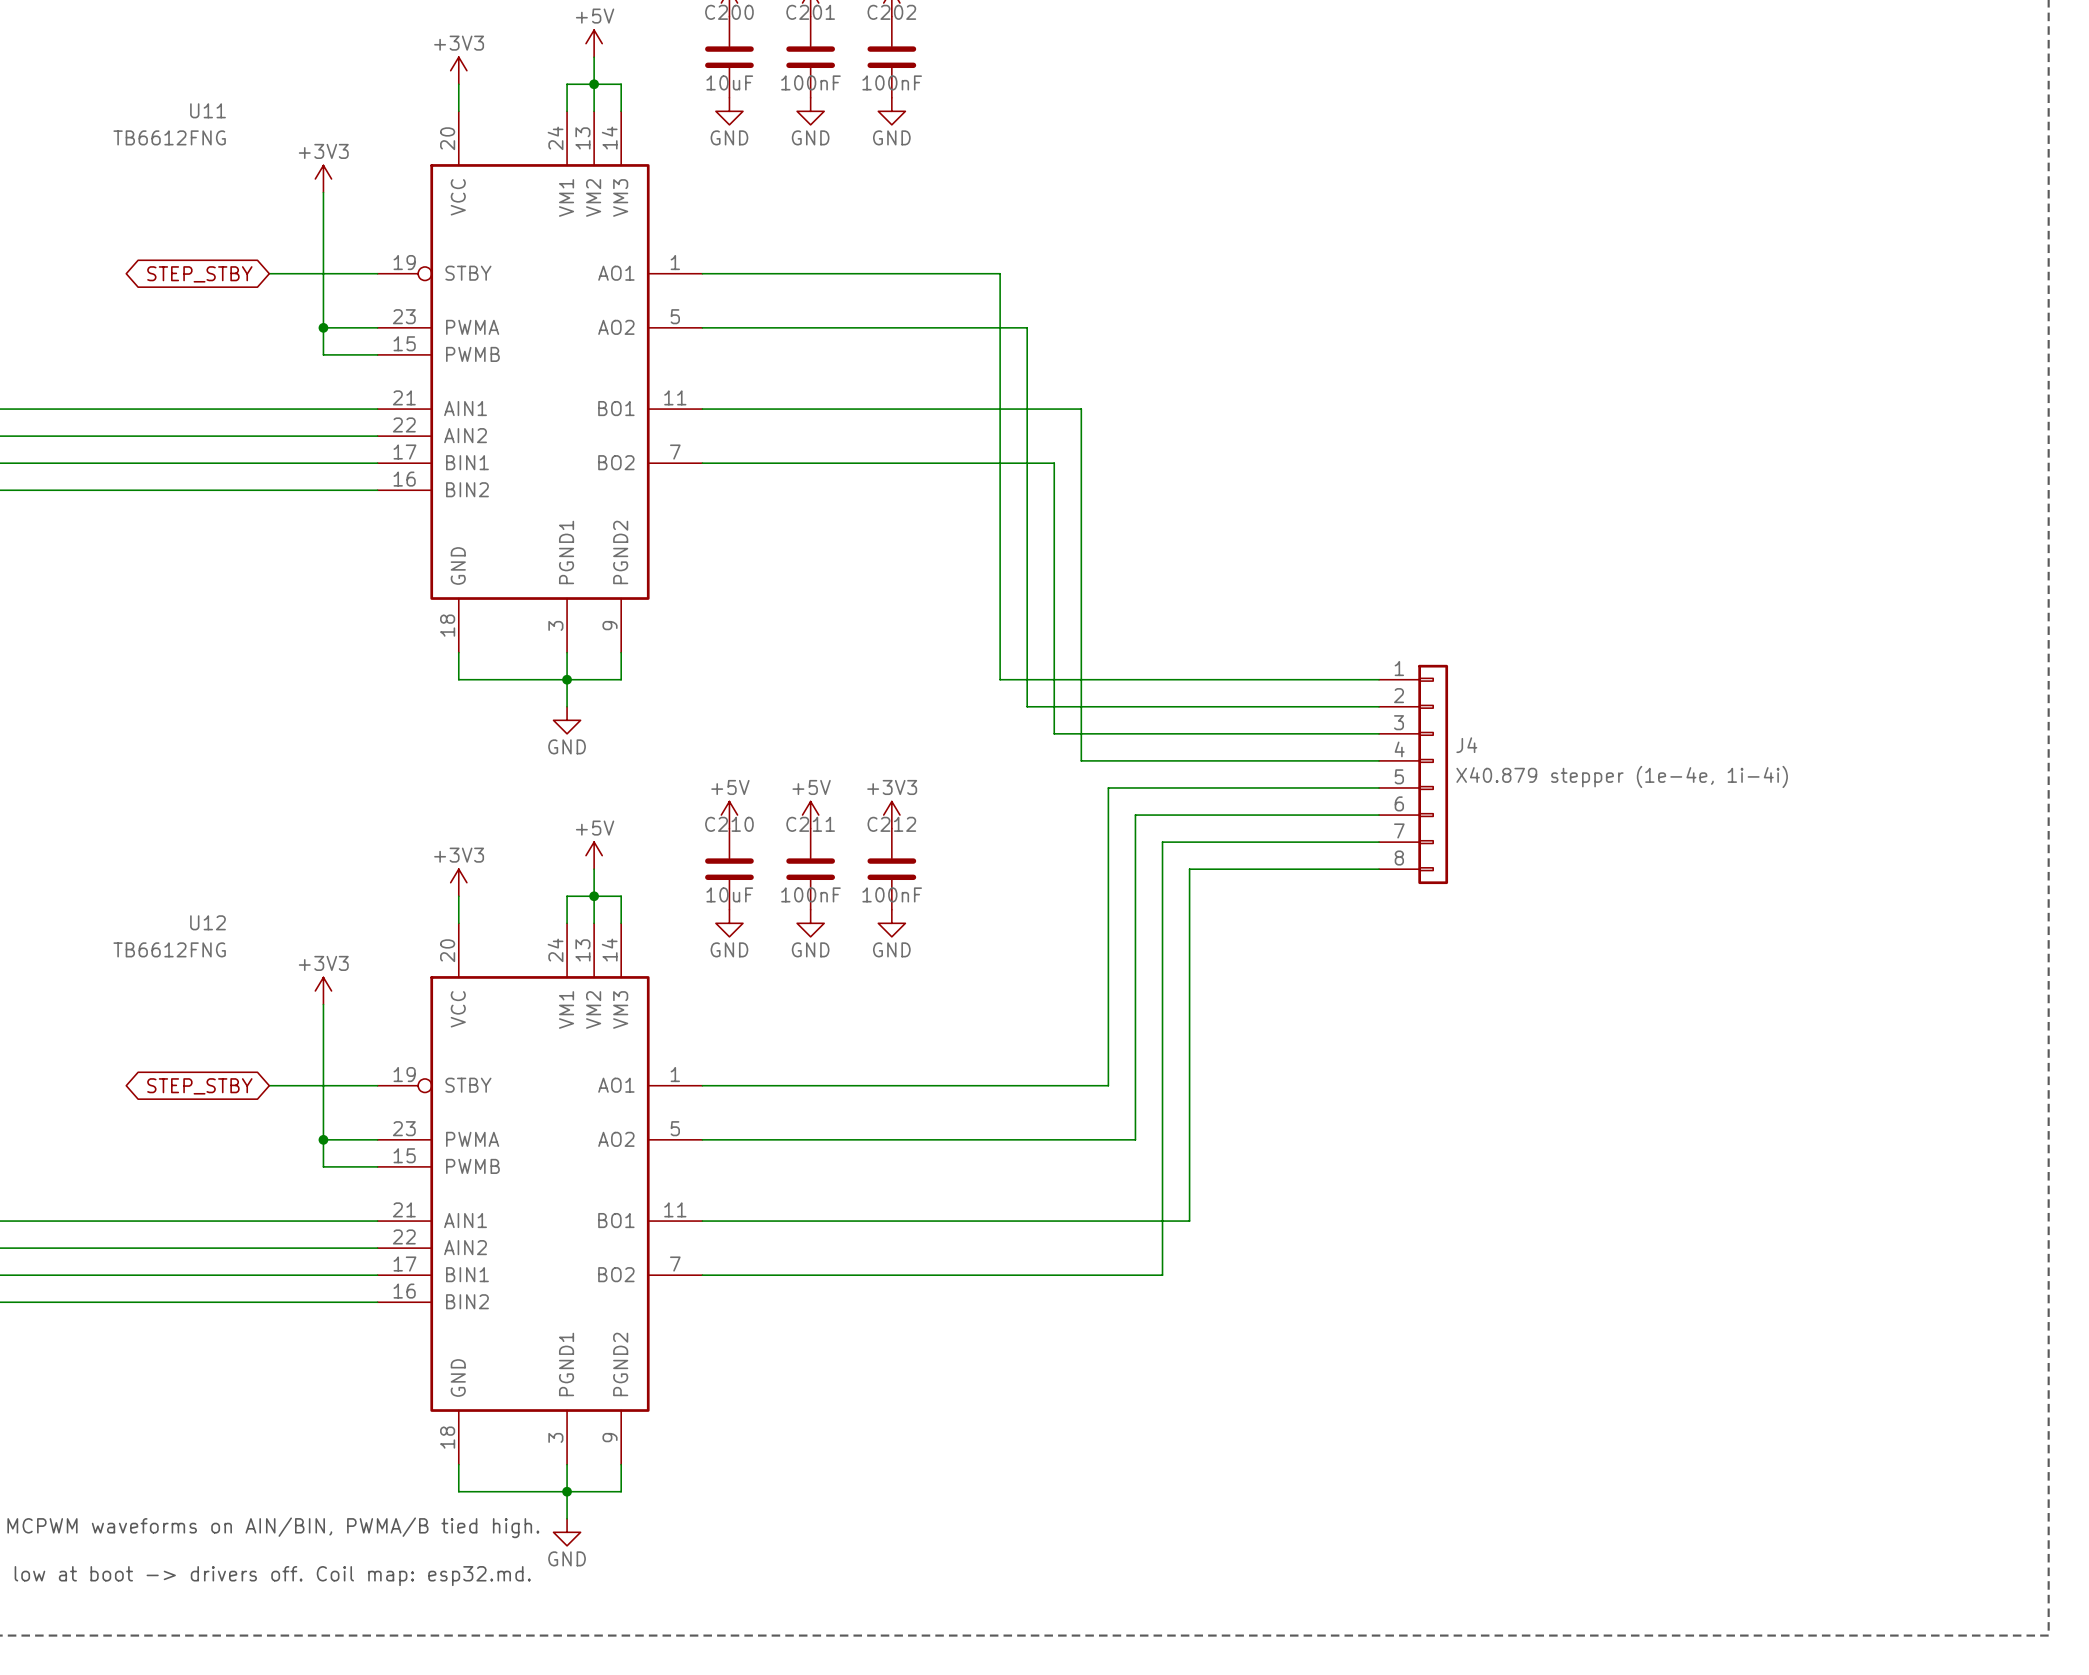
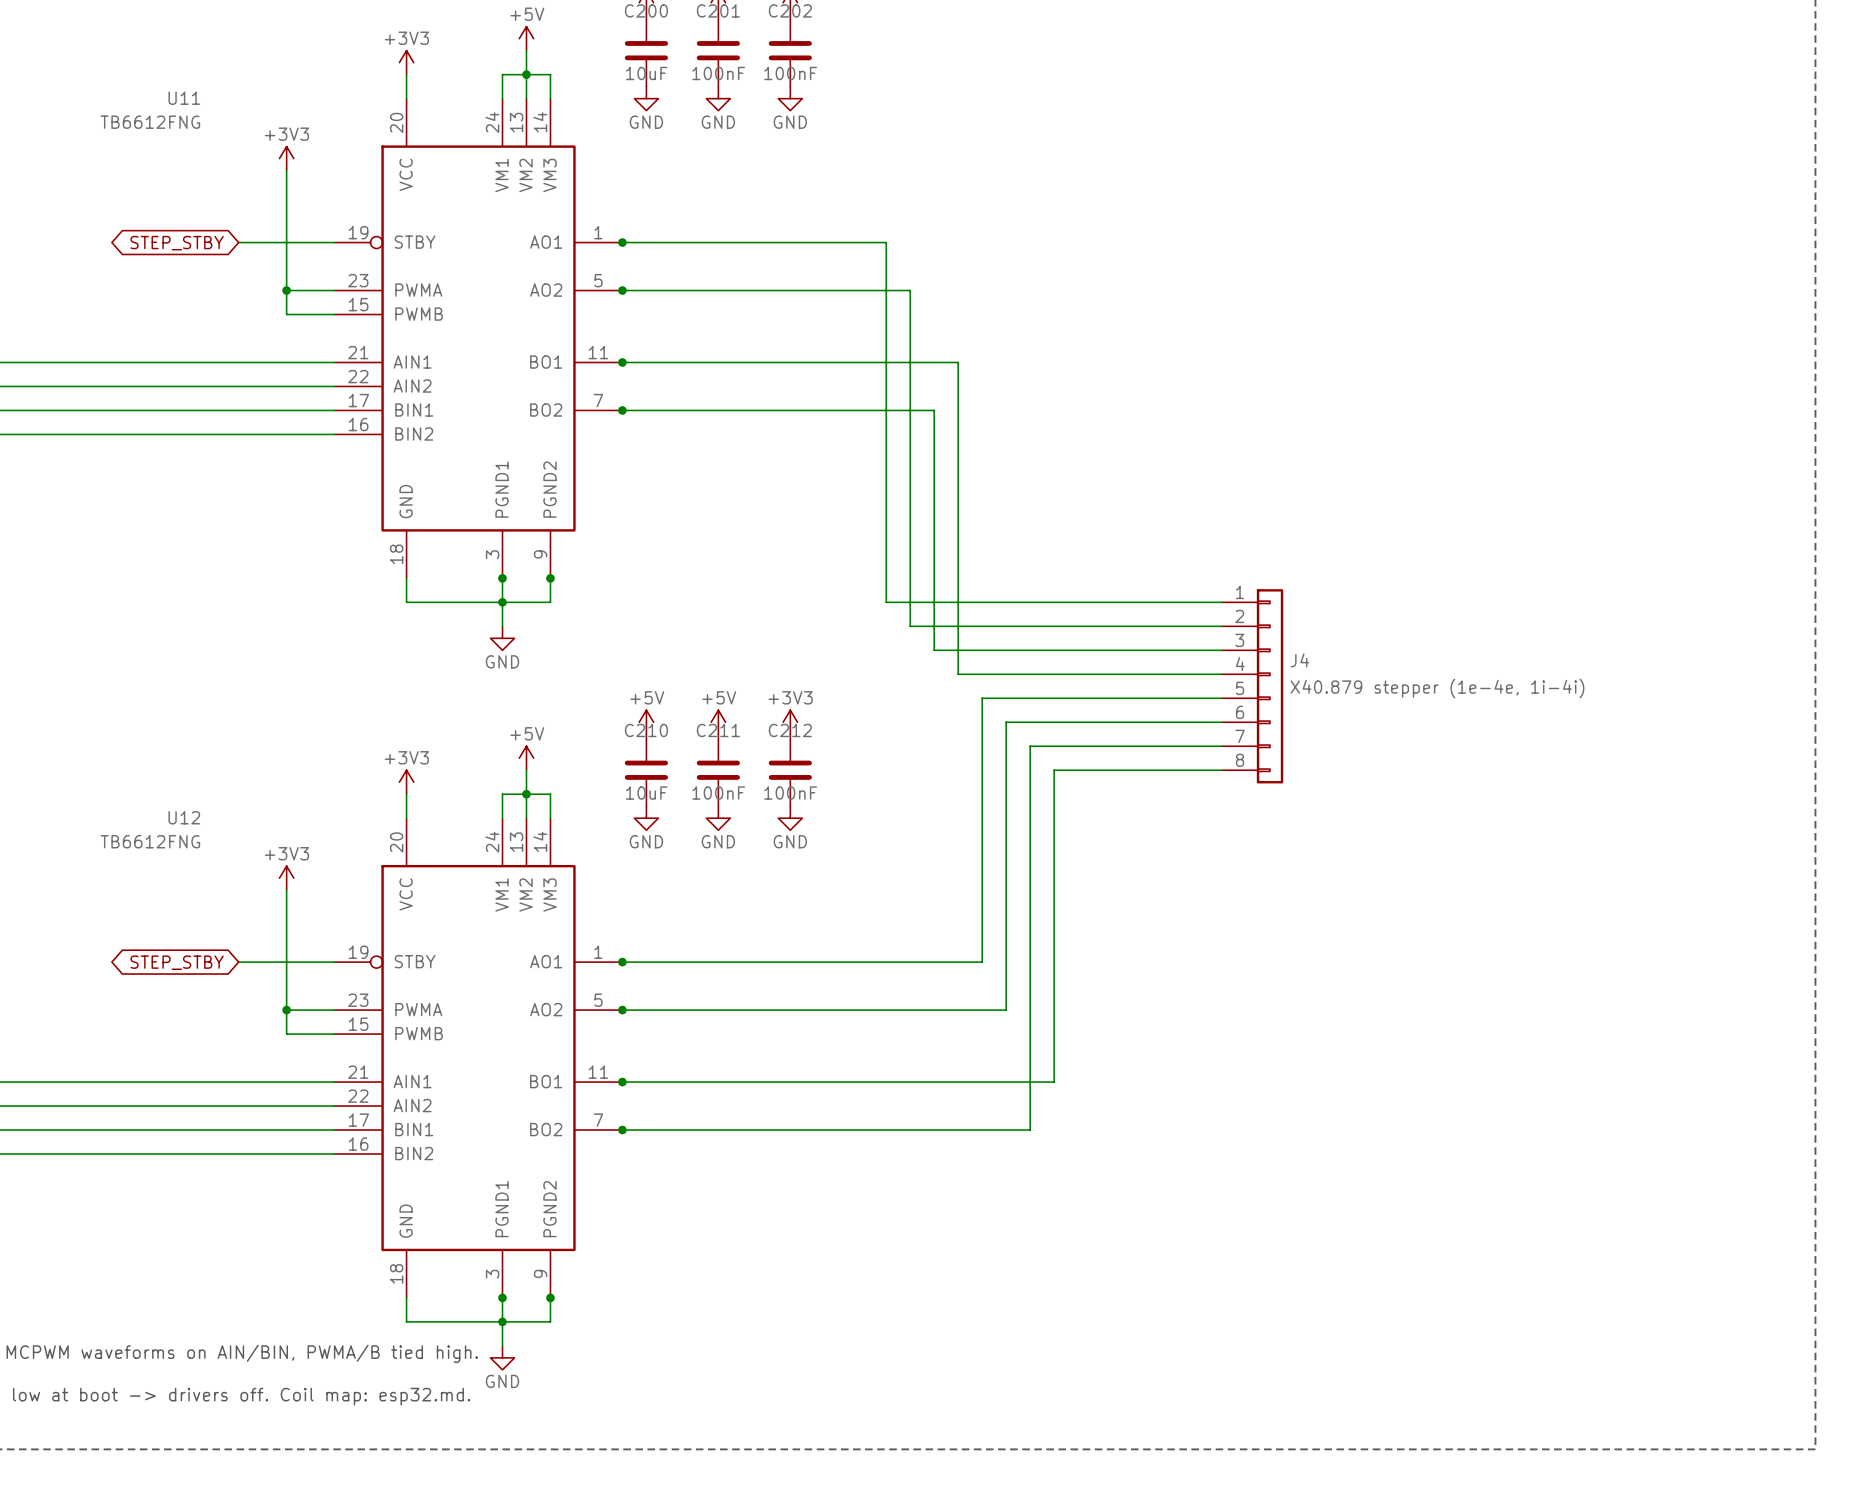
junction: none -> (622, 242)
junction: none -> (622, 290)
junction: none -> (622, 362)
junction: none -> (622, 410)
junction: none -> (502, 578)
junction: none -> (550, 578)
junction: none -> (622, 962)
junction: none -> (622, 1010)
junction: none -> (622, 1082)
junction: none -> (622, 1130)
junction: none -> (502, 1297)
junction: none -> (550, 1297)

